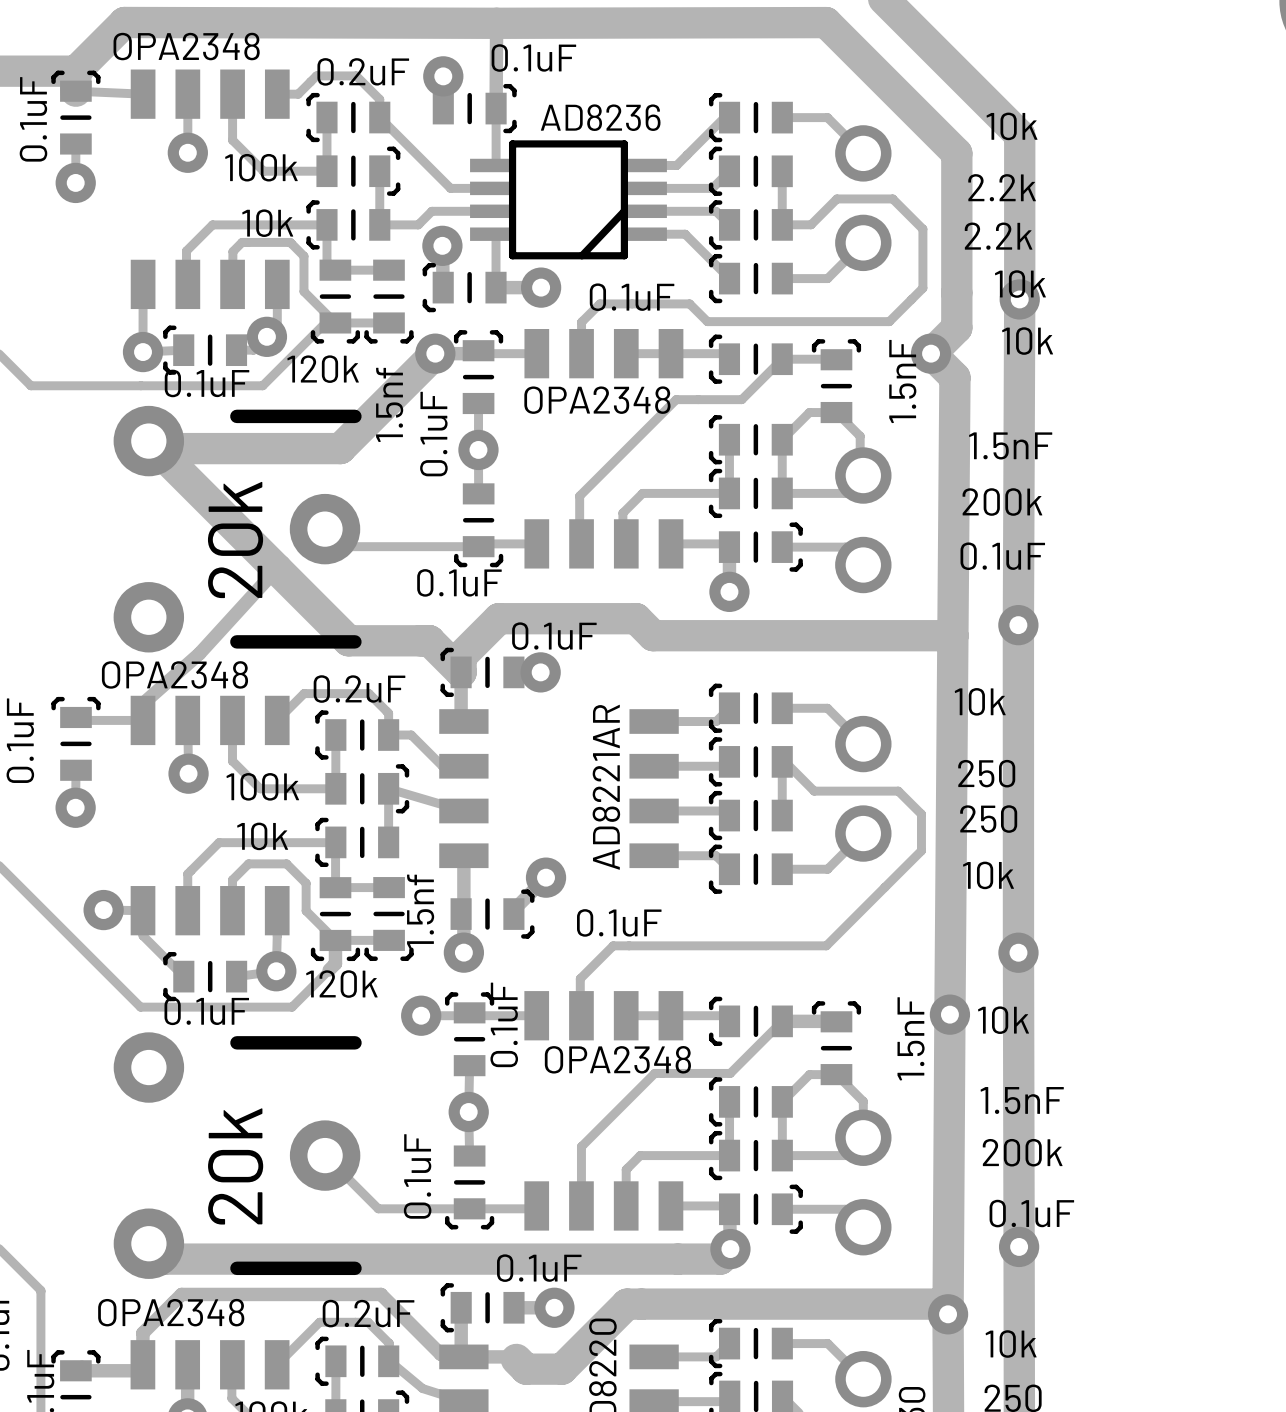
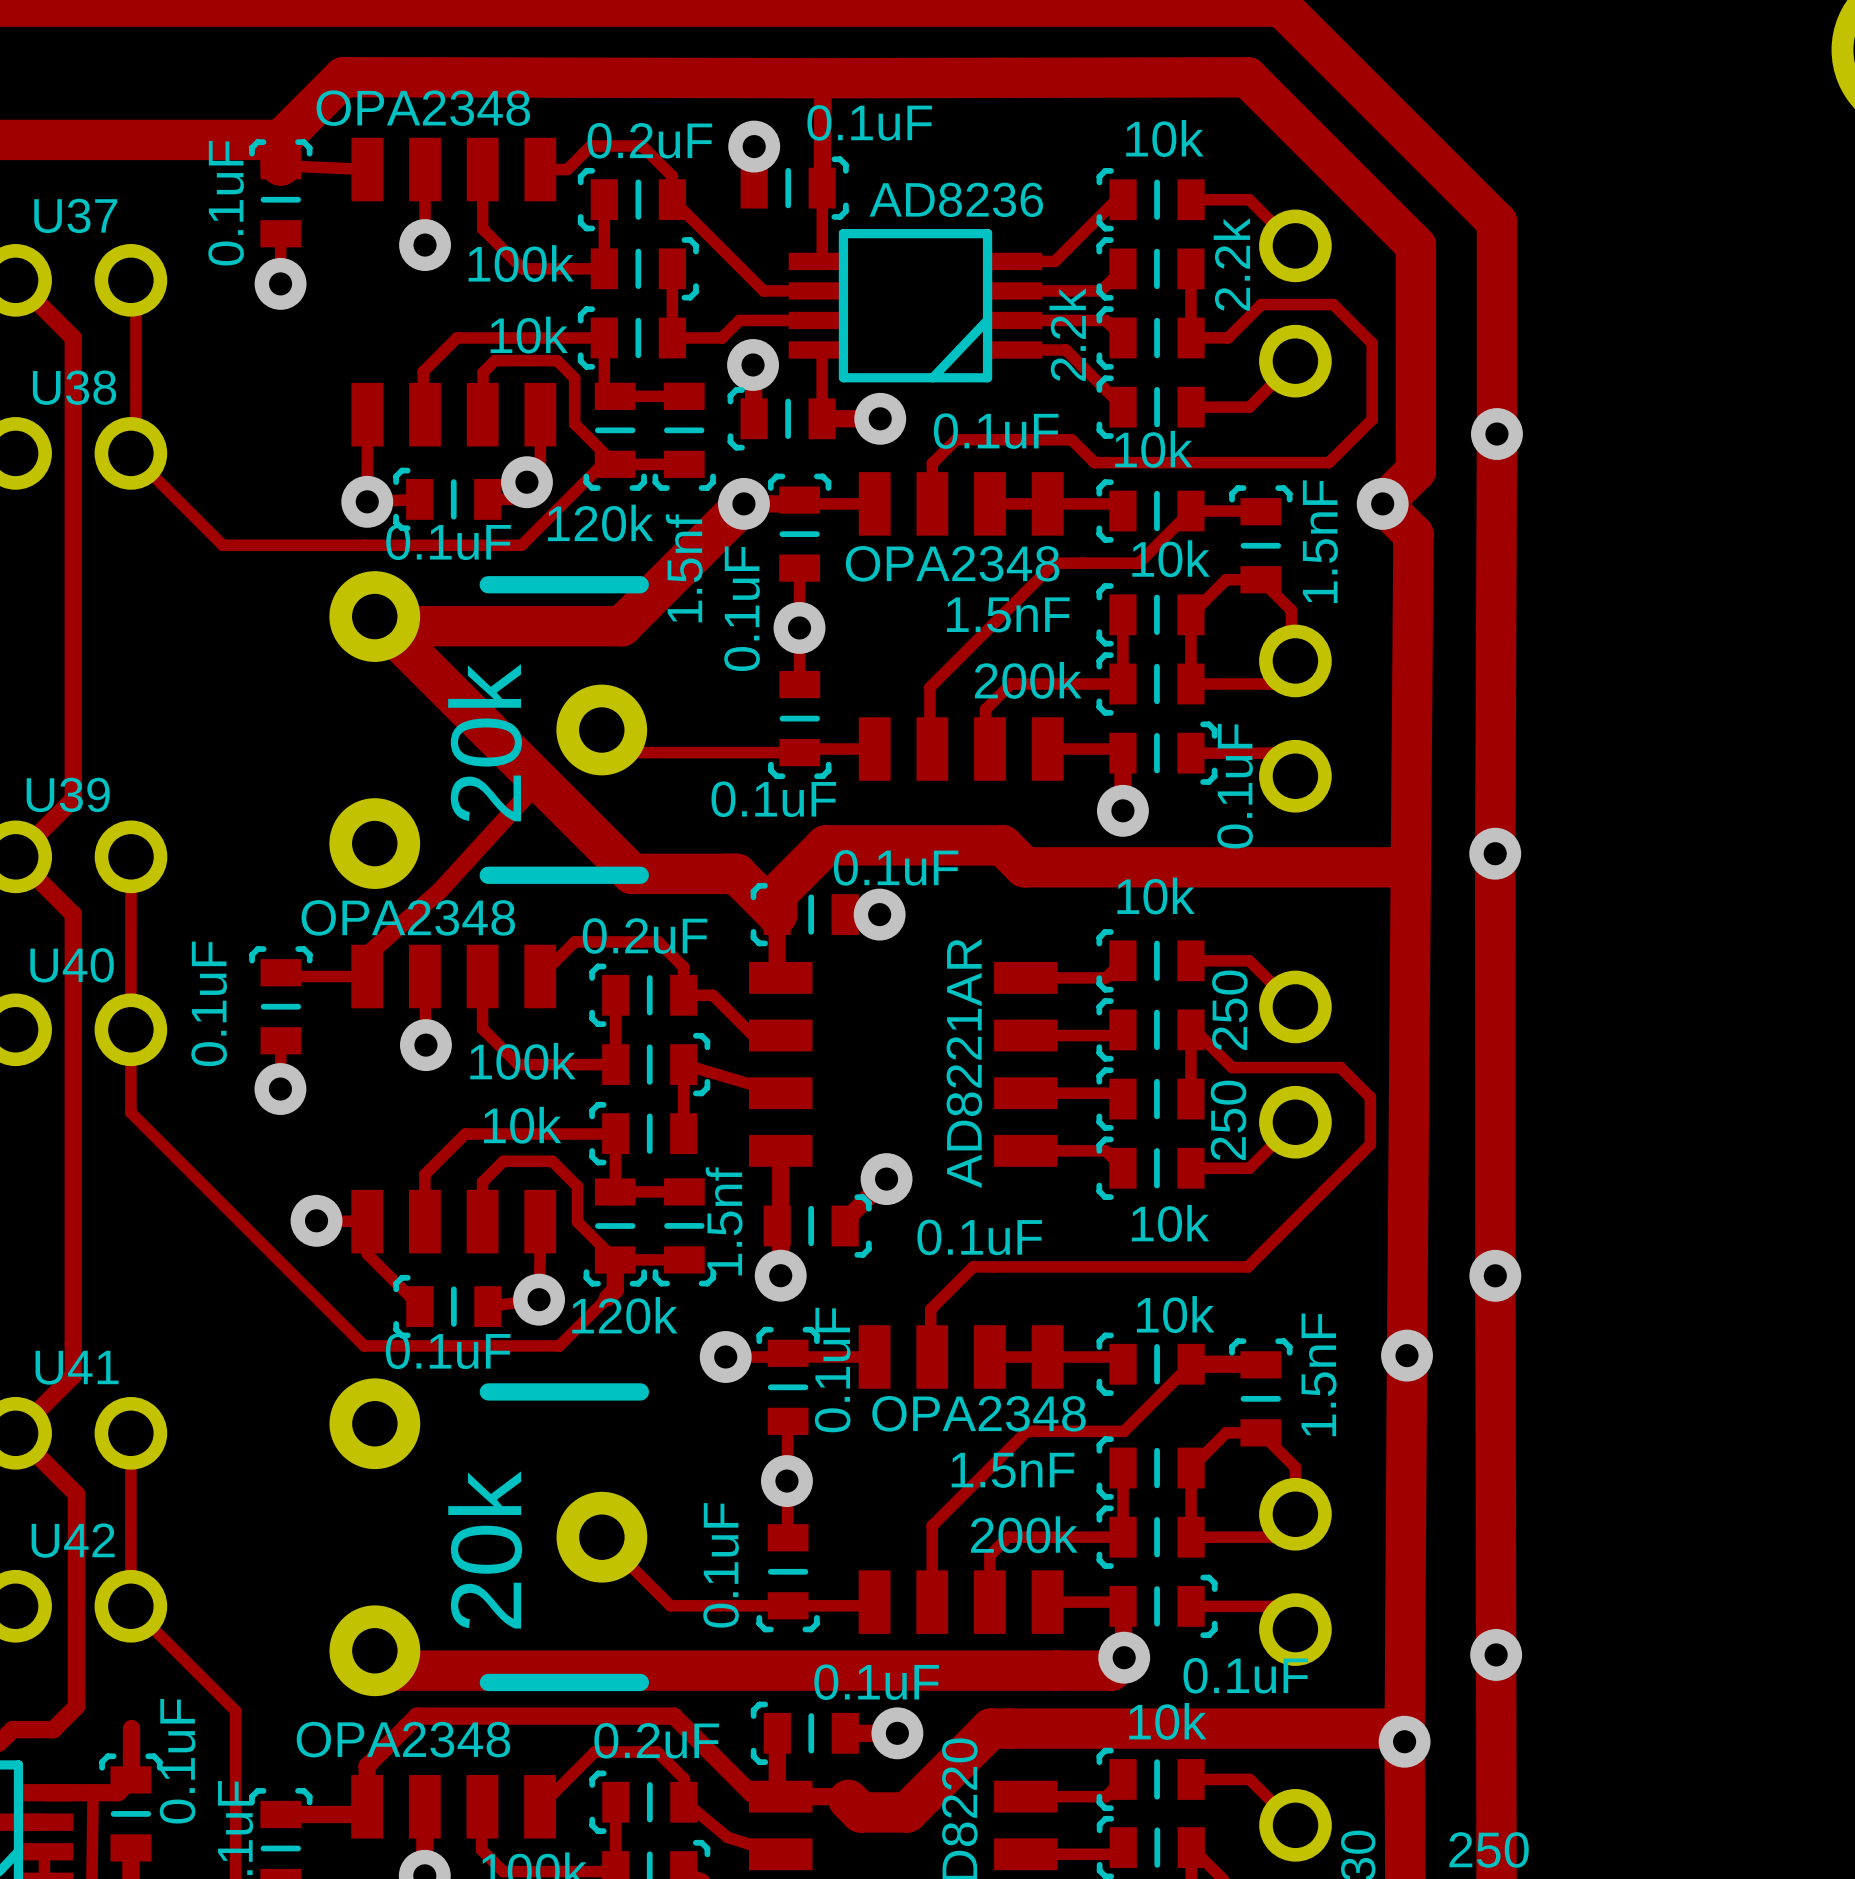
part value position: 10k (1012, 126) -> 10k (1164, 138)
part value rotation: 0° (1002, 187) -> 90° counterclockwise (1231, 264)
part value position: 2.2k (1002, 187) -> 2.2k (1231, 264)
part value rotation: 0° (998, 236) -> 90° counterclockwise (1067, 334)
part value position: 2.2k (998, 236) -> 2.2k (1067, 334)
part value position: 10k (1020, 284) -> 10k (1153, 449)
part value position: 10k (1027, 341) -> 10k (1171, 558)
part value position: 1.5nF (902, 381) -> 1.5nF (1320, 541)
part value position: 1.5nF (1010, 445) -> 1.5nF (1008, 614)
part value position: 200k (1002, 502) -> 200k (1028, 680)
part value rotation: 0° (1002, 556) -> 90° counterclockwise (1235, 786)
part value position: 0.1uF (1002, 556) -> 0.1uF (1235, 786)
part value position: 10k (980, 701) -> 10k (1156, 896)
part value rotation: 0° (986, 773) -> 90° counterclockwise (1229, 1010)
part value position: 250 (986, 773) -> 250 (1229, 1010)
part value rotation: 0° (988, 819) -> 90° counterclockwise (1228, 1120)
part value position: 250 (988, 819) -> 250 (1228, 1120)
part value position: 10k (988, 875) -> 10k (1170, 1223)
part value position: 10k (1003, 1020) -> 10k (1175, 1314)
part value position: 1.5nF (911, 1038) -> 1.5nF (1319, 1374)
part value position: 1.5nF (1022, 1100) -> 1.5nF (1013, 1470)
part value position: 200k (1022, 1152) -> 200k (1024, 1534)
part value position: 0.1uF (1031, 1213) -> 0.1uF (1245, 1675)
part value position: 10k (1011, 1344) -> 10k (1167, 1721)

